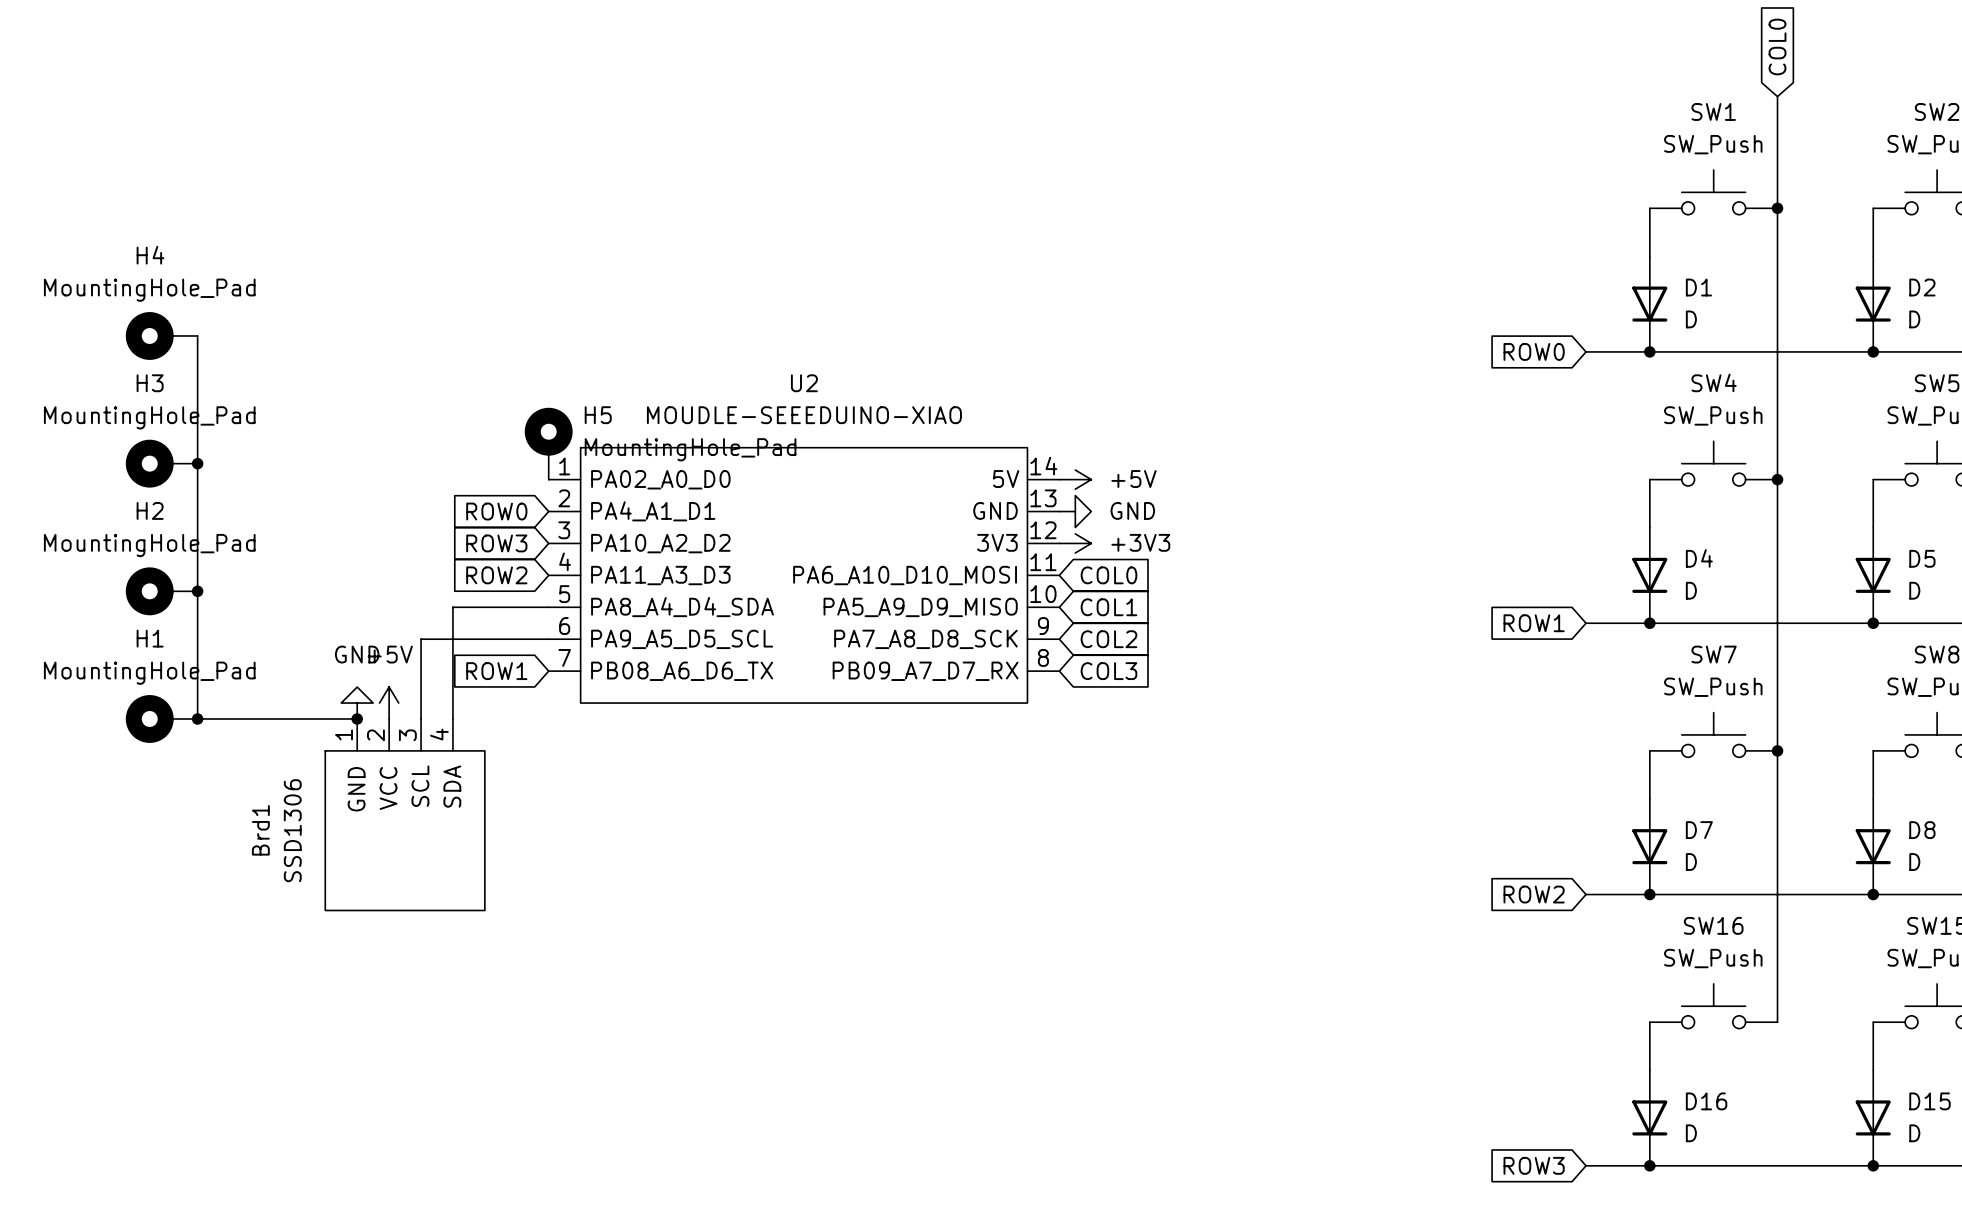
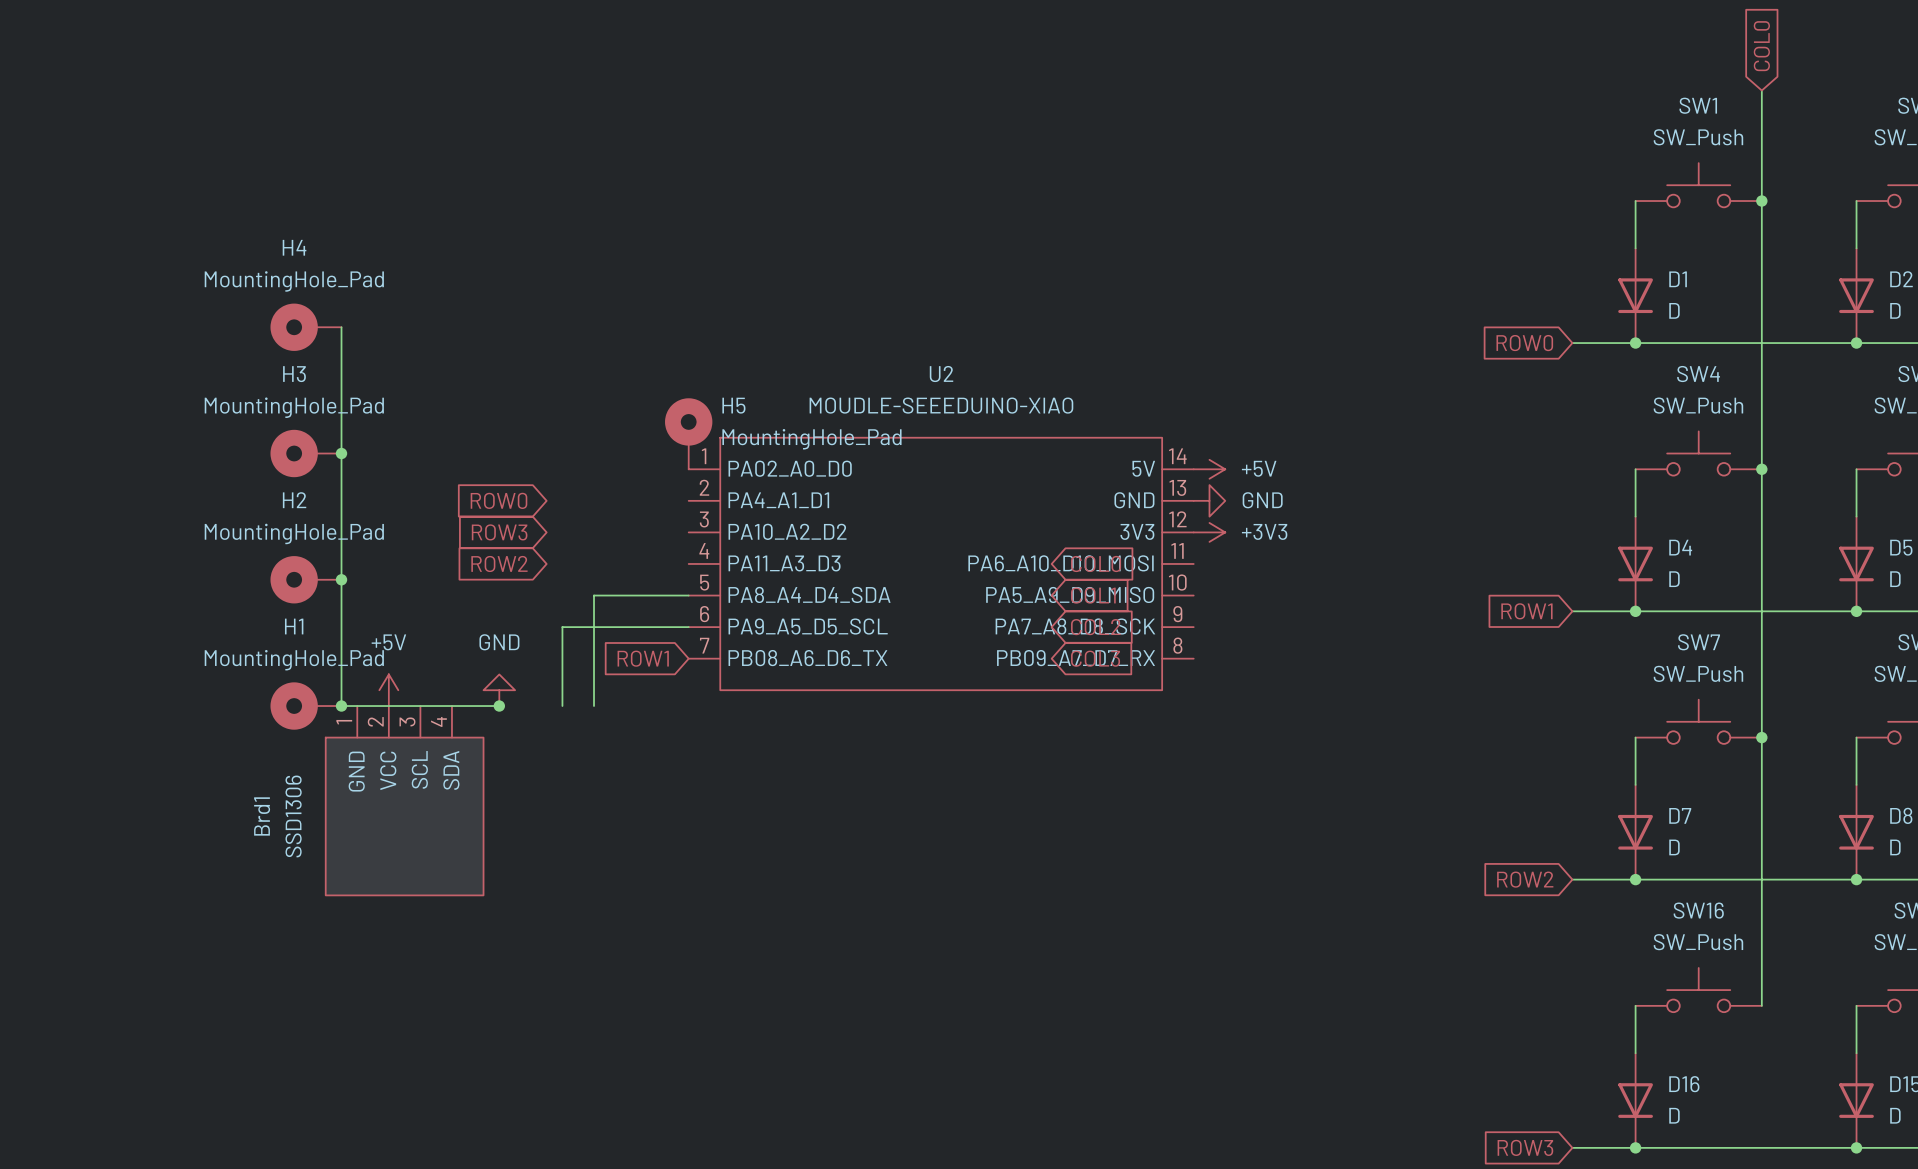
H4 position: (161, 335) -> (305, 327)
wire: (197, 335) (197, 718) (341, 718) -> (341, 327) (341, 706)
H5 position: (548, 443) -> (688, 433)
H3 position: (161, 463) -> (305, 453)
junction: (197, 463) -> none
junction: none -> (341, 453)
power symbol position: +5V (1075, 479) -> +5V (1209, 469)
power symbol position: GND (1075, 511) -> GND (1209, 500)
power symbol position: +3V3 (1075, 543) -> +3V3 (1209, 532)
U2 position: (804, 575) -> (941, 563)
H2 position: (161, 591) -> (305, 579)
junction: (197, 591) -> none
junction: none -> (341, 579)
wire: (548, 607) (452, 607) (452, 718) -> (688, 595) (594, 595) (594, 706)
wire: (548, 639) (421, 639) (421, 718) -> (688, 627) (562, 627) (562, 706)
global label position: ROW1 (496, 671) -> ROW1 (643, 658)
power symbol position: GND (357, 703) -> GND (499, 690)
H1 position: (161, 718) -> (305, 706)
junction: (197, 718) -> none
wire: none -> (357, 706) (499, 706)
junction position: (357, 718) -> (341, 706)
junction: none -> (499, 706)

